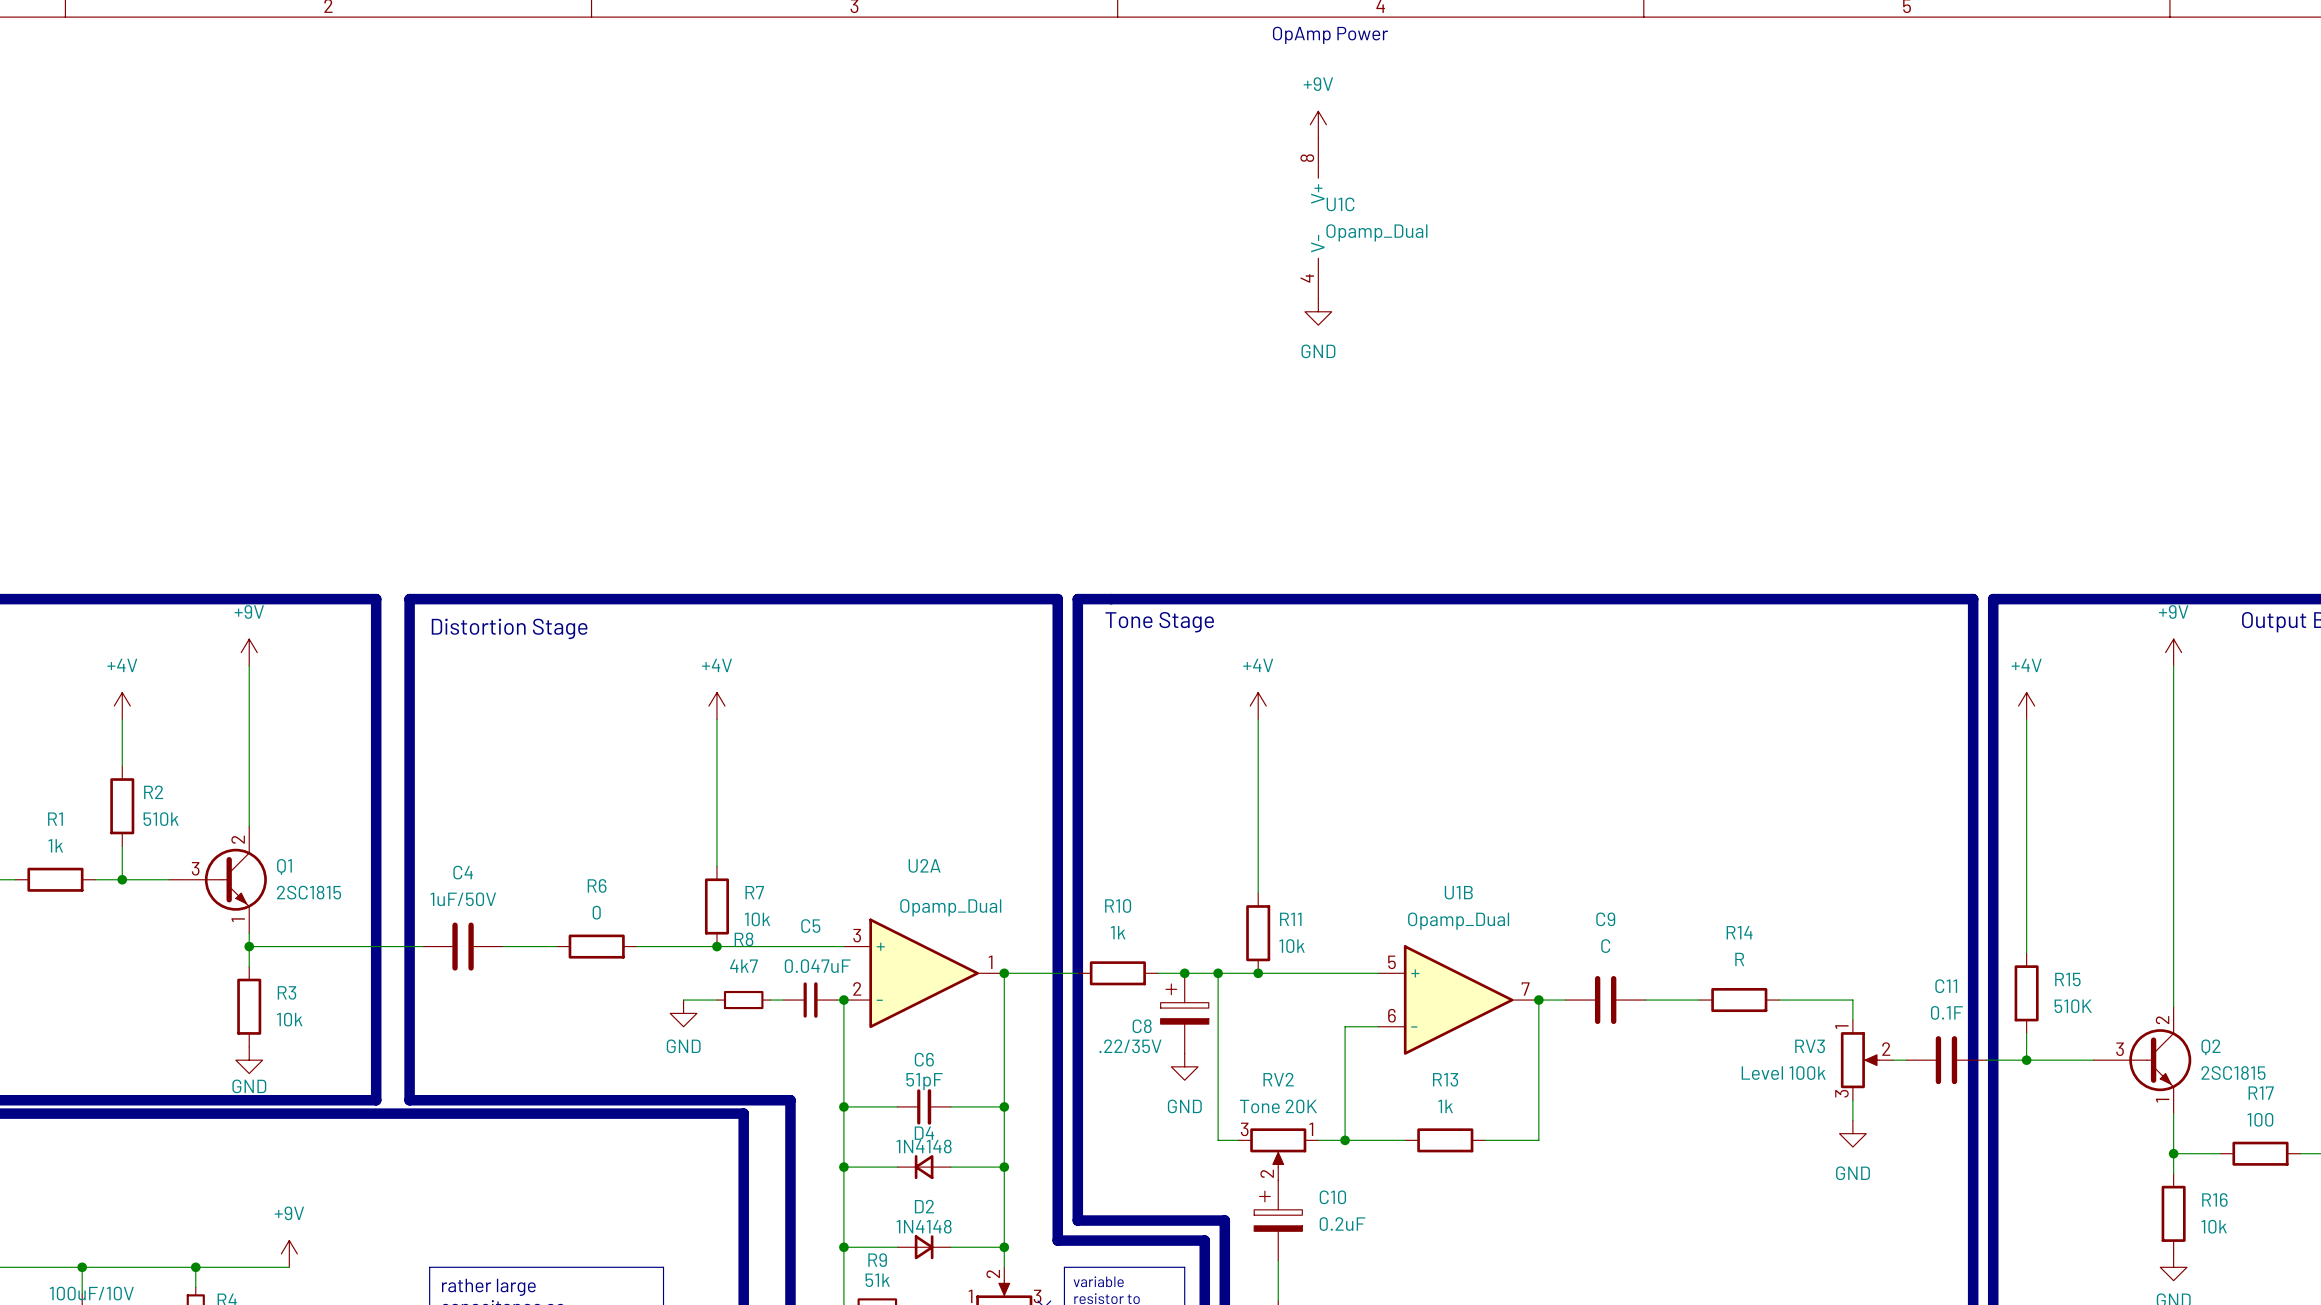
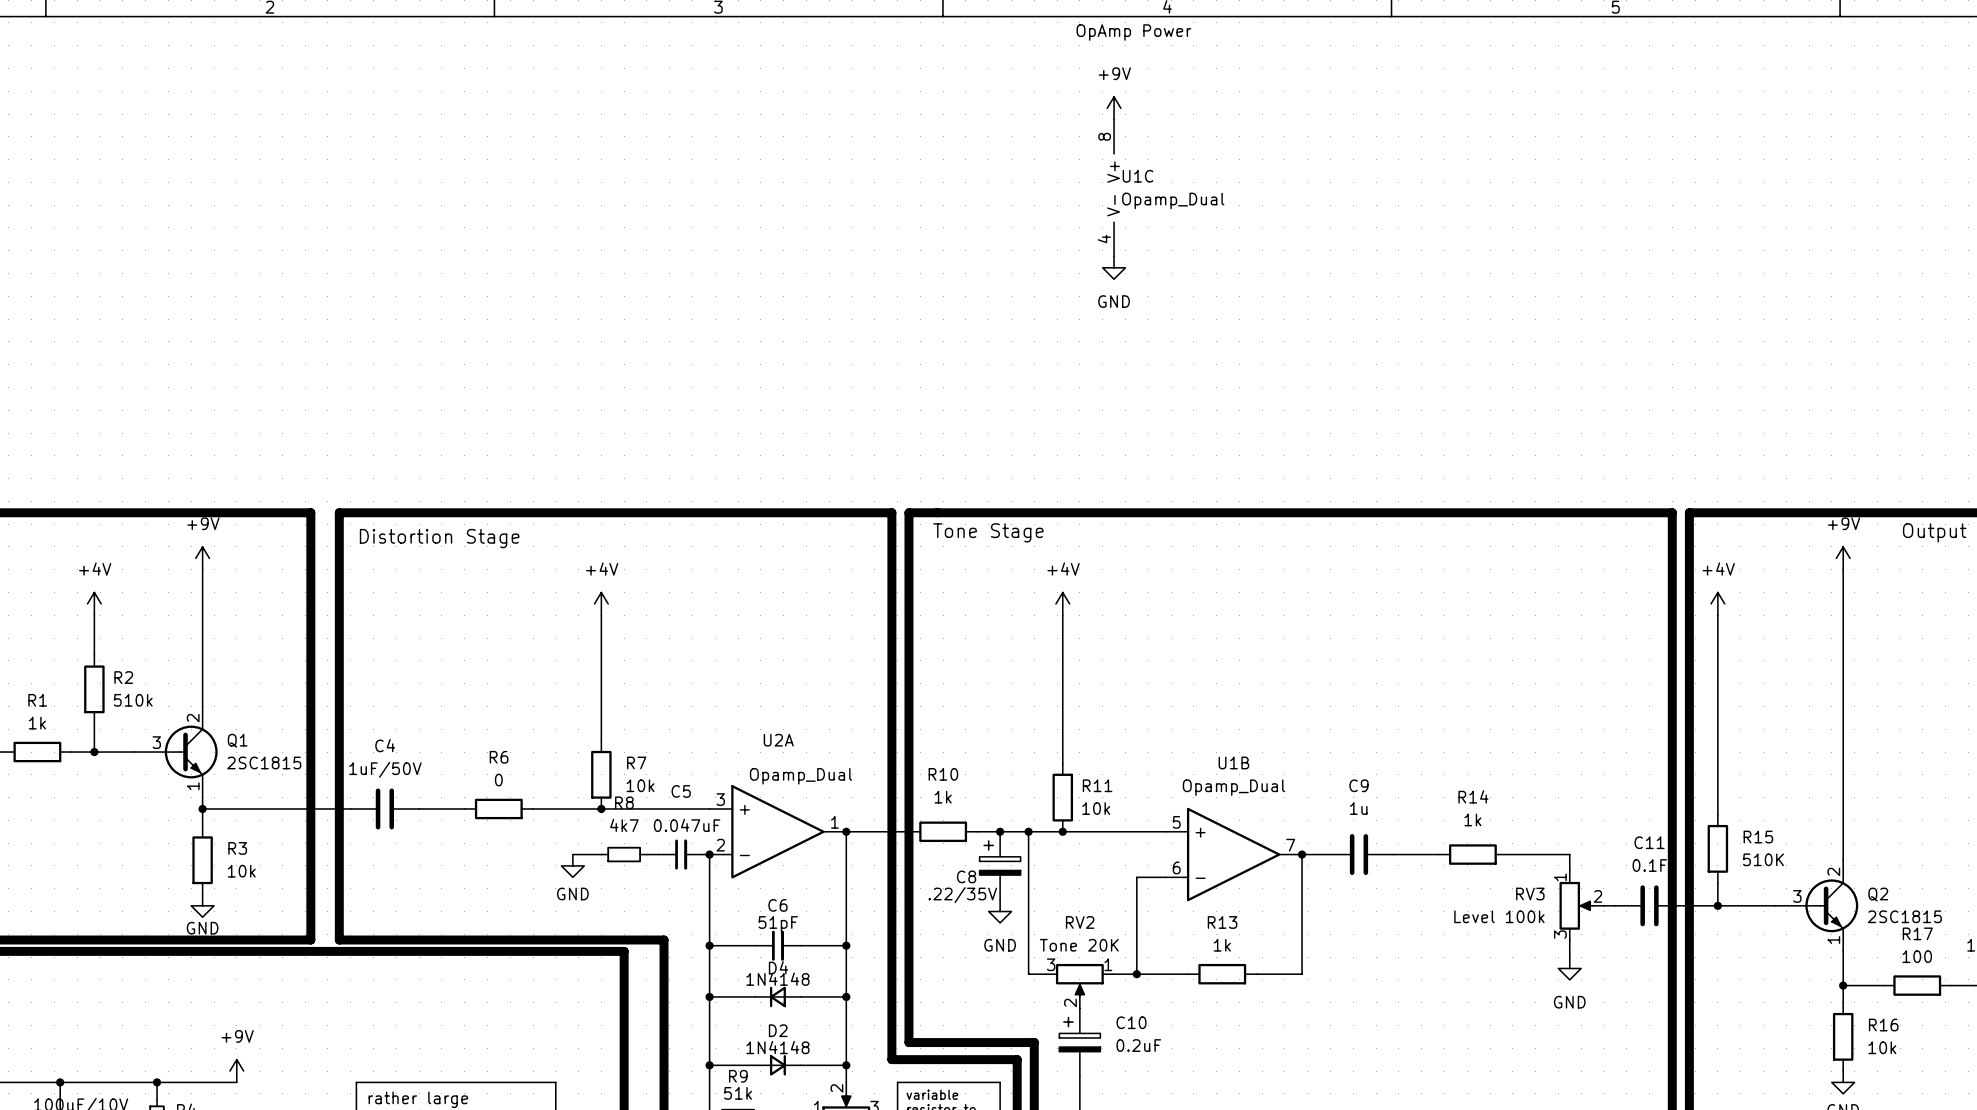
C9 value: C (1605, 946) -> 1u (1358, 808)
R14 value: R (1739, 959) -> 1k (1472, 819)

